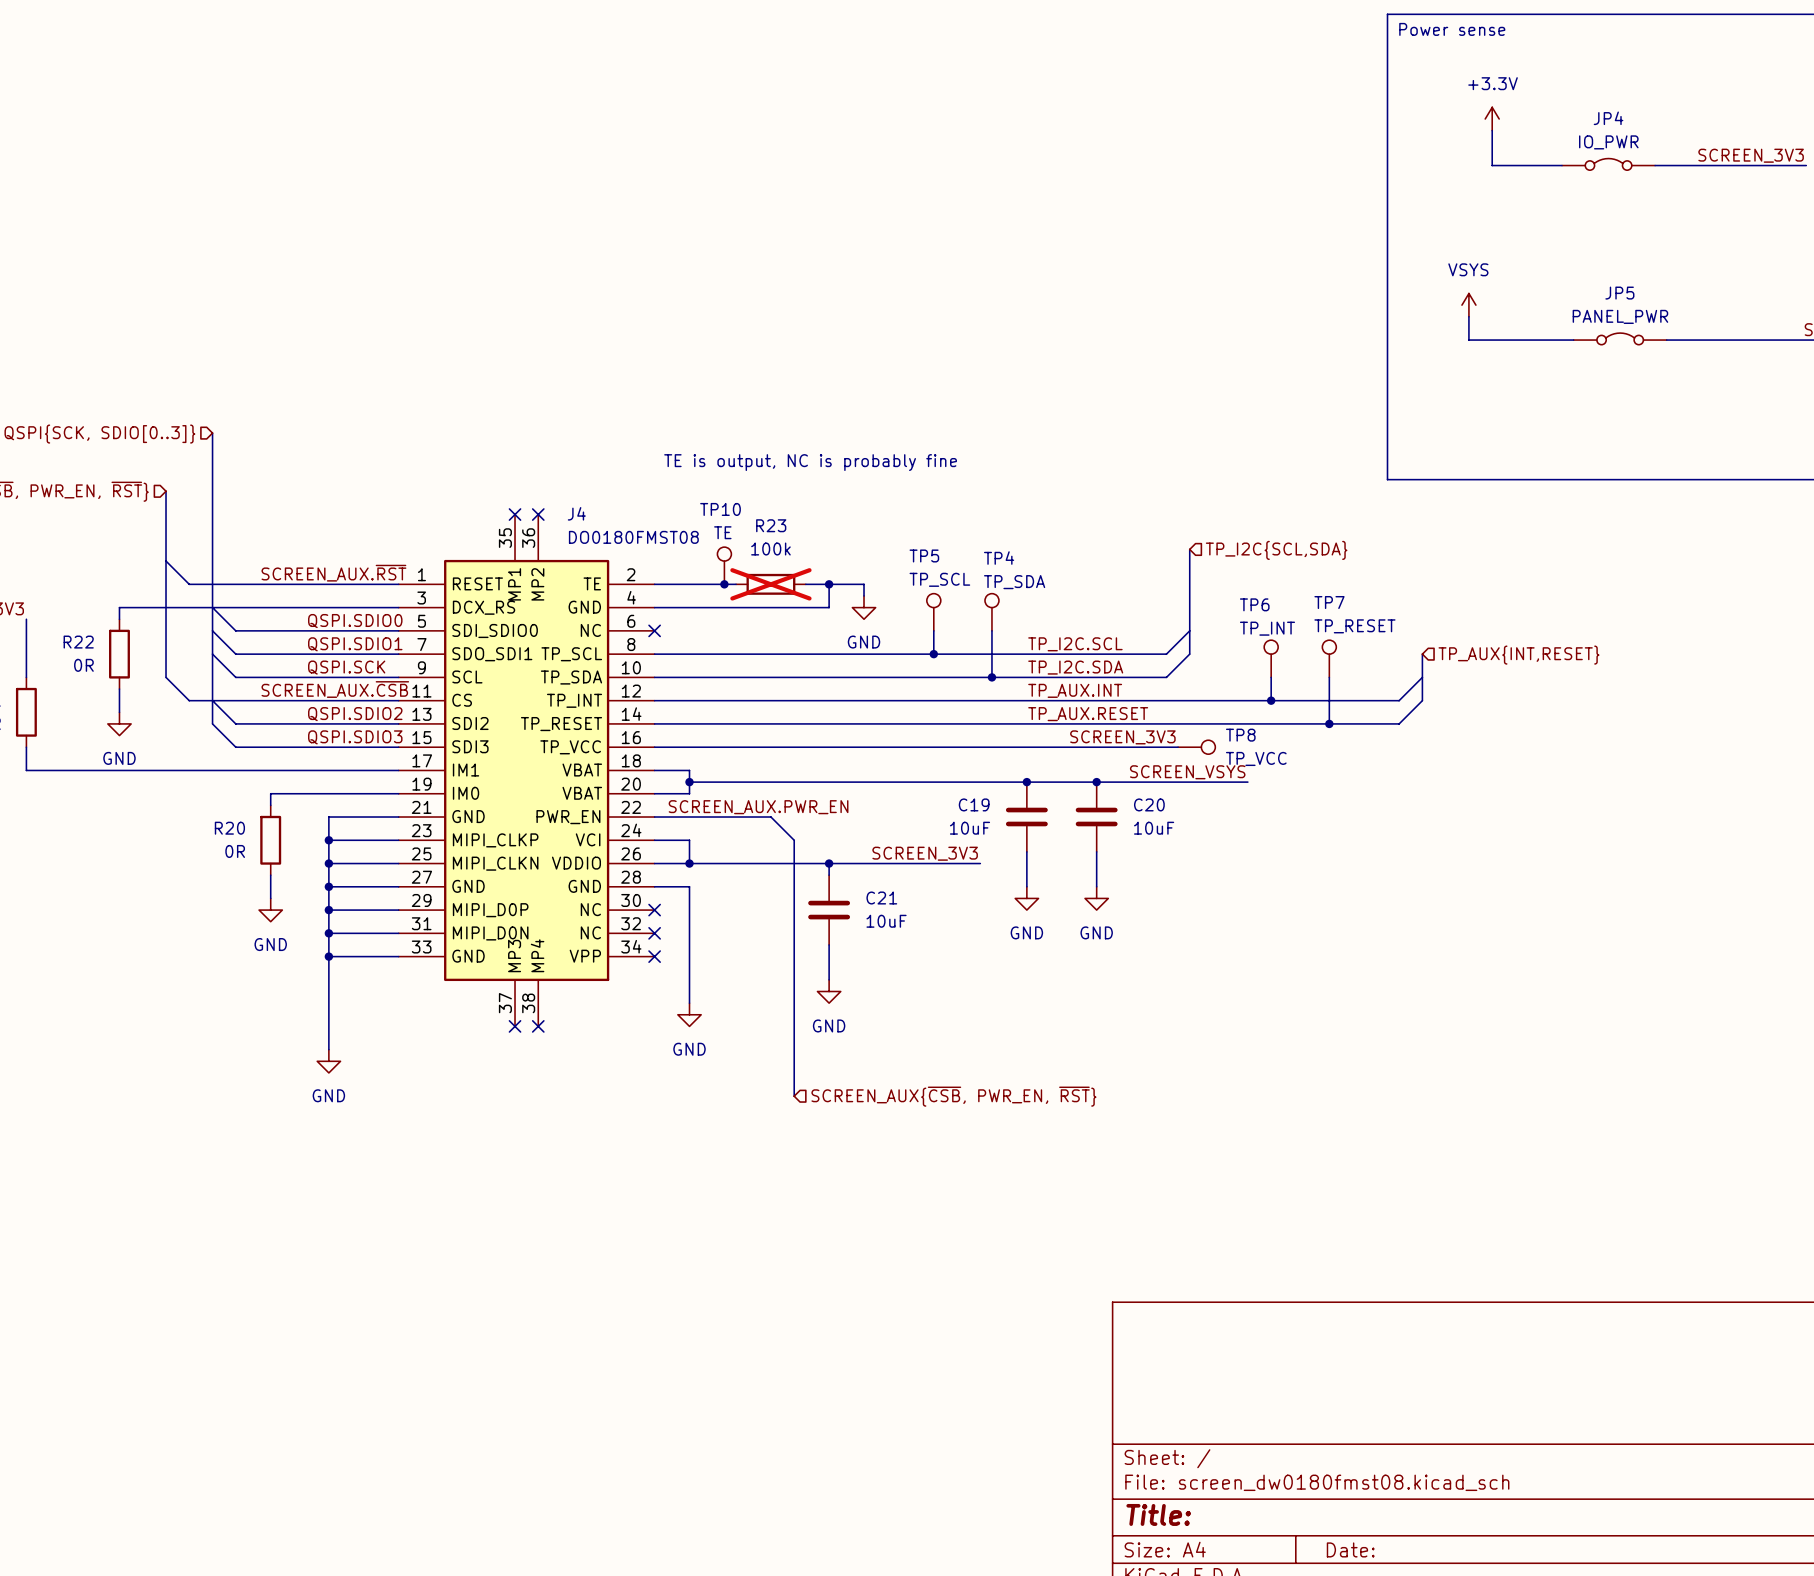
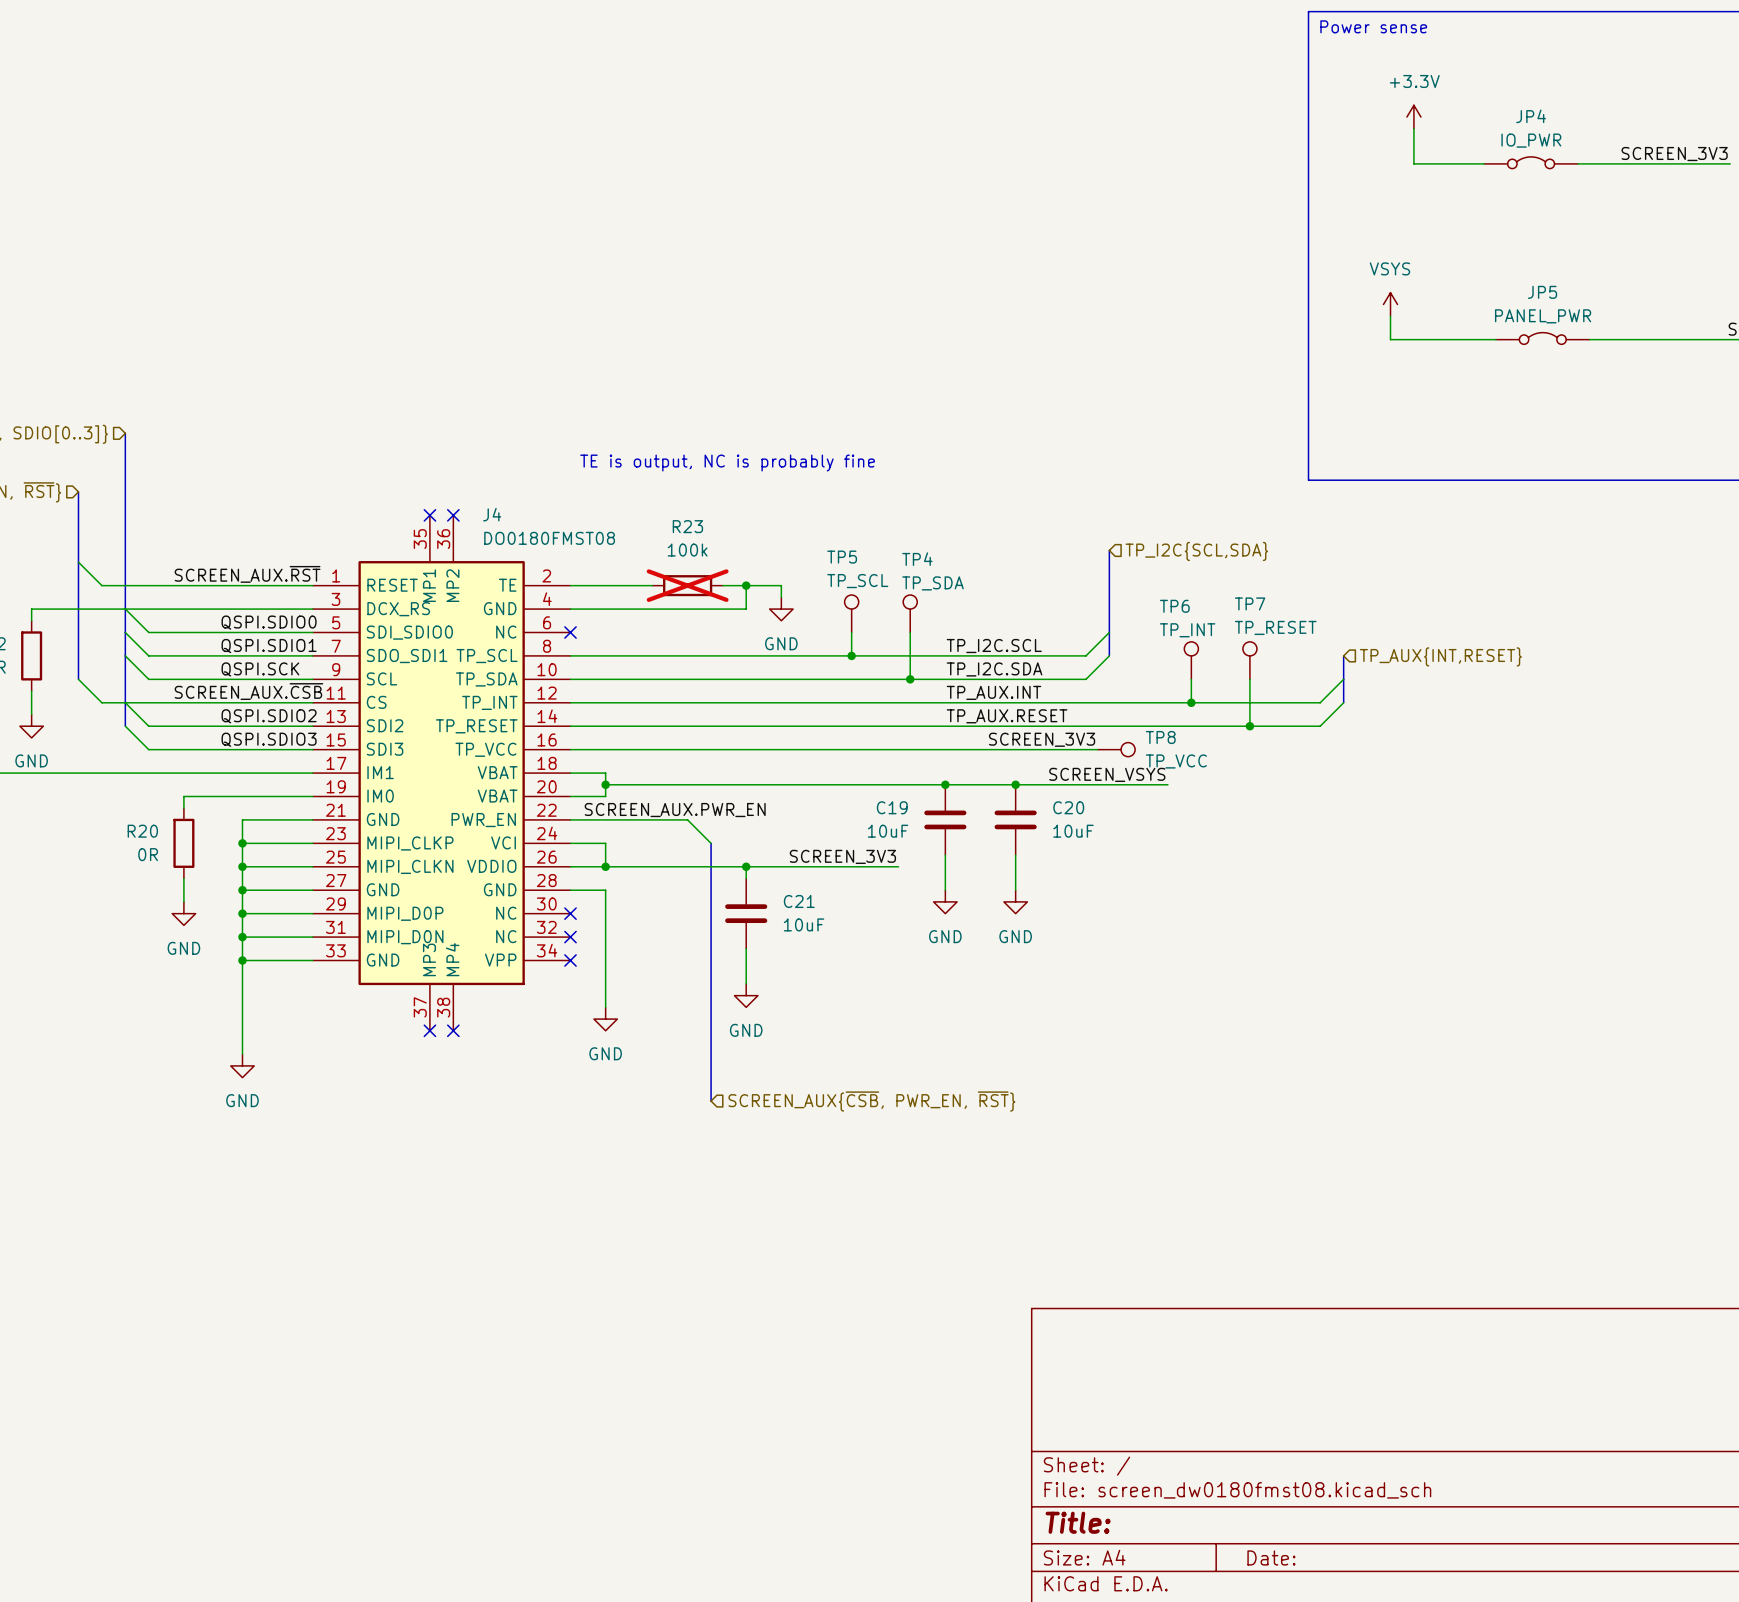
TP10: TE (724, 565) -> none
junction: (724, 584) -> none

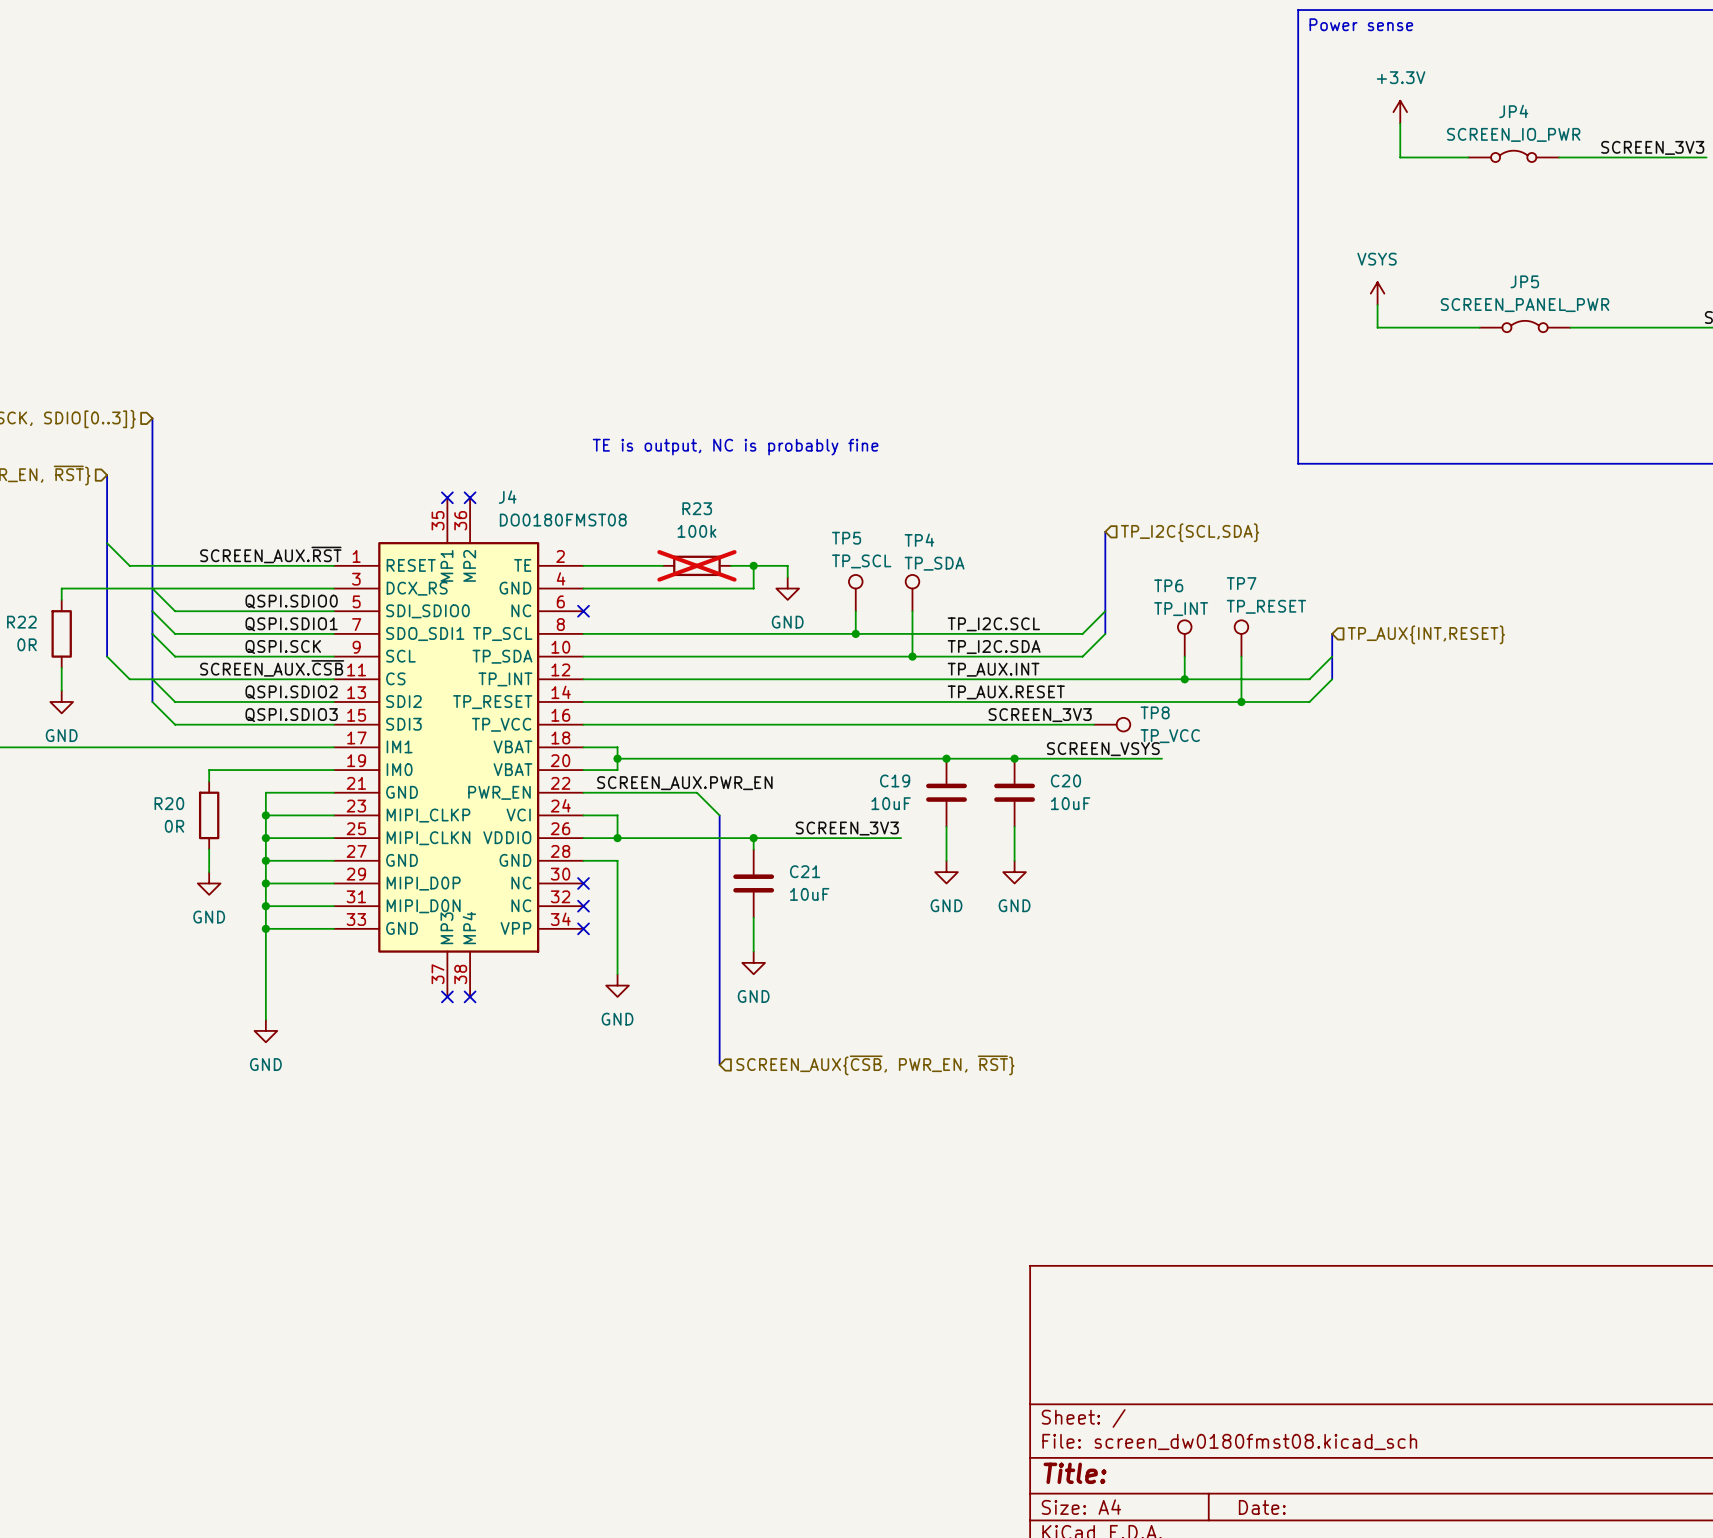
JP4 value: IO_PWR (1531, 140) -> SCREEN_IO_PWR (1513, 134)
JP5 value: PANEL_PWR (1543, 316) -> SCREEN_PANEL_PWR (1525, 305)

